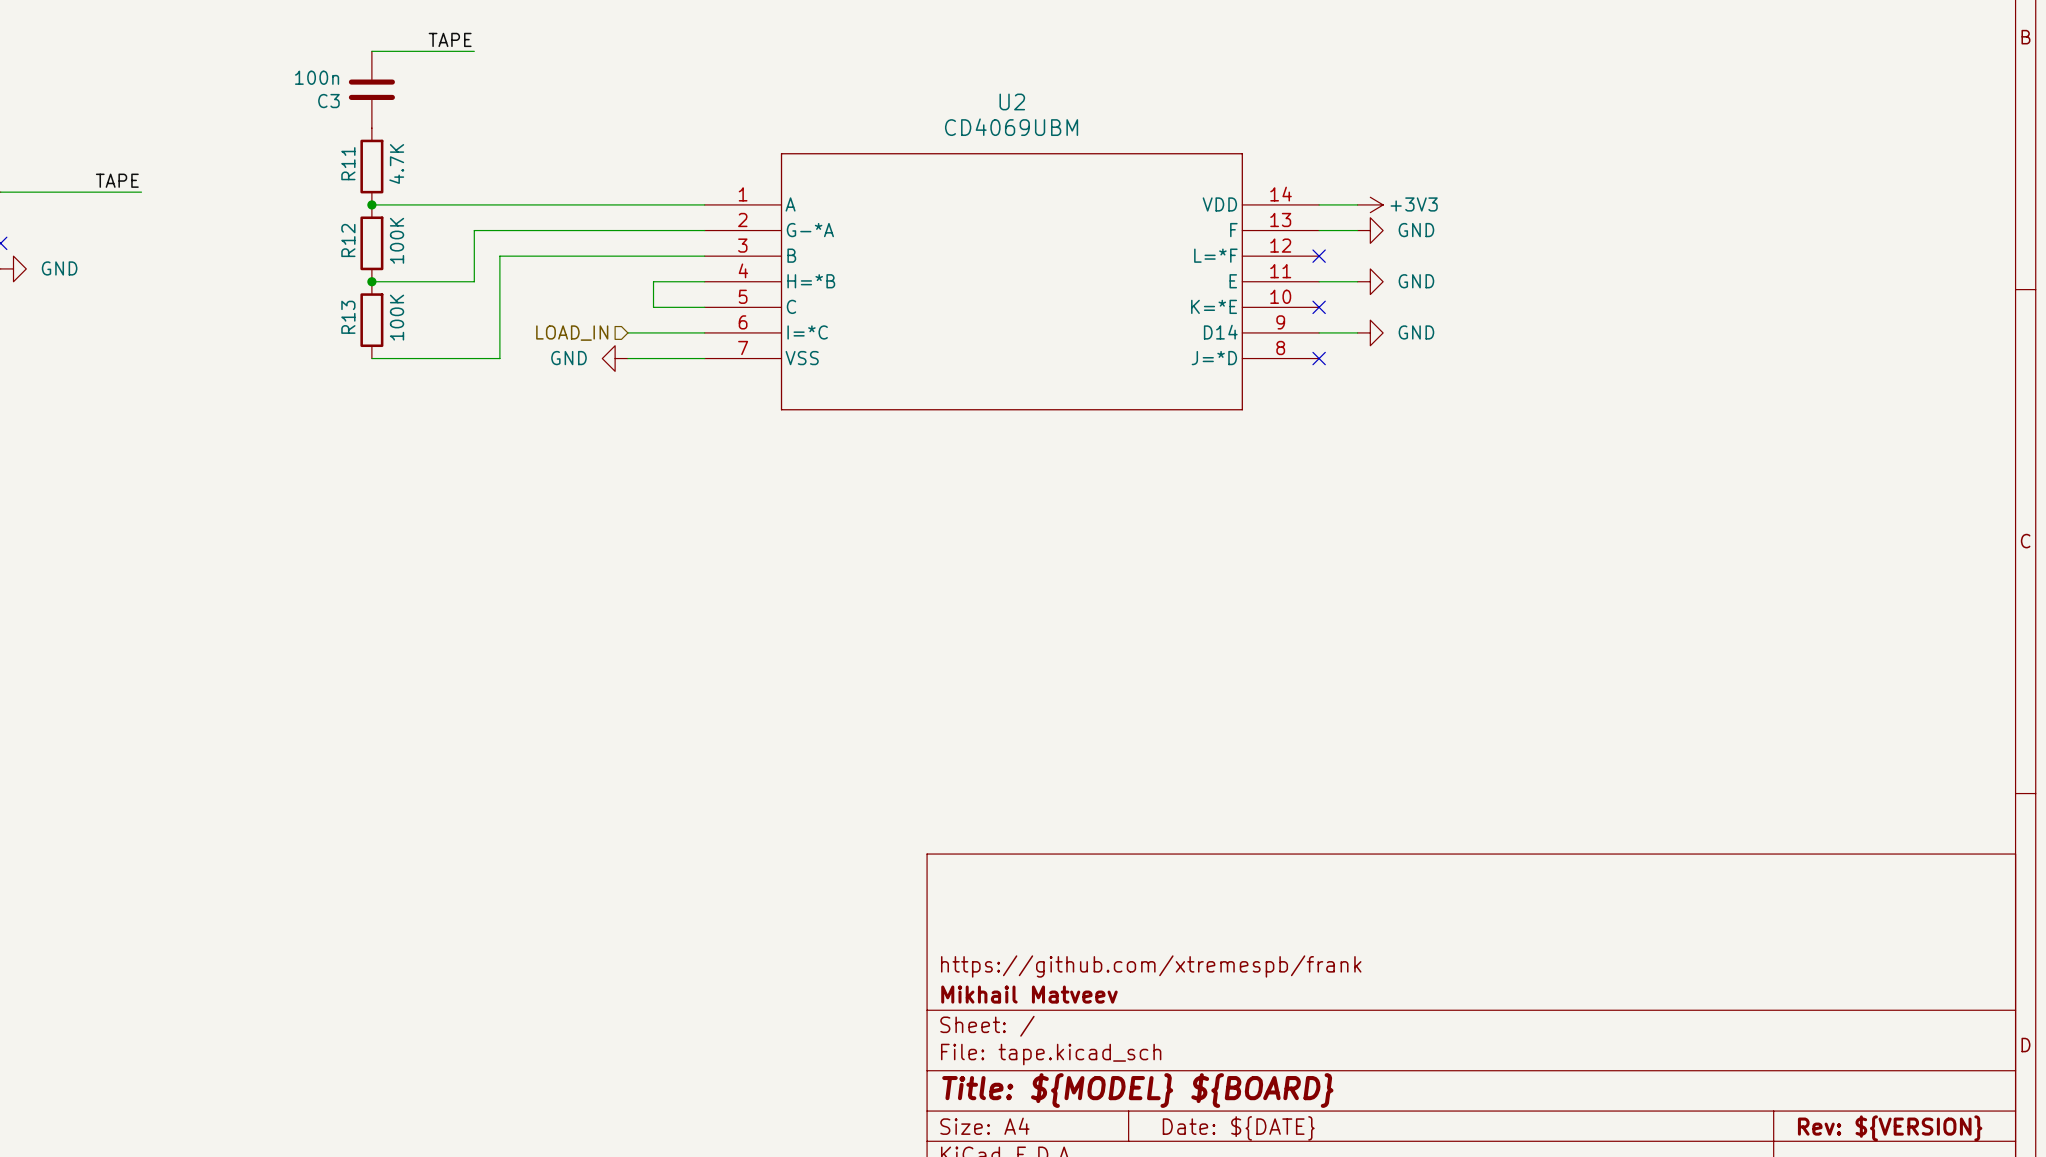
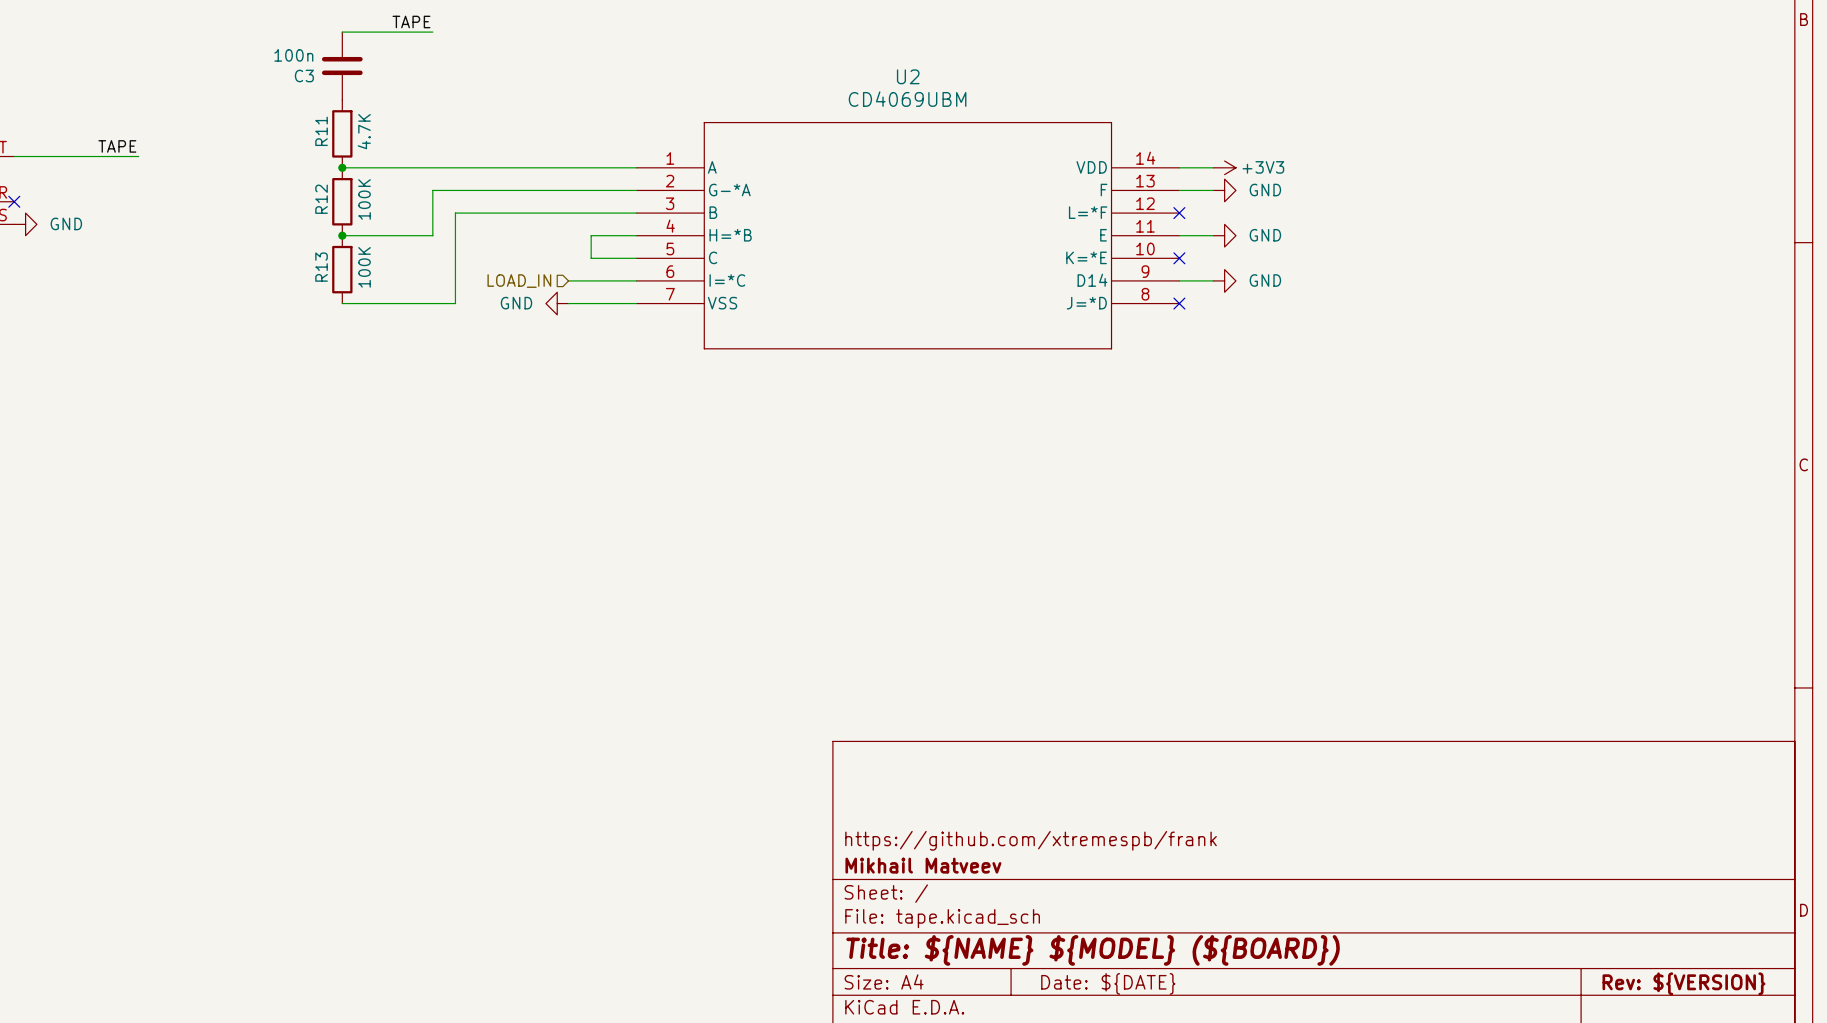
title block: Title: ${MODEL} ${BOARD} (1137, 1090) -> Title: ${NAME} ${MODEL} (${BOARD}) (1093, 950)

